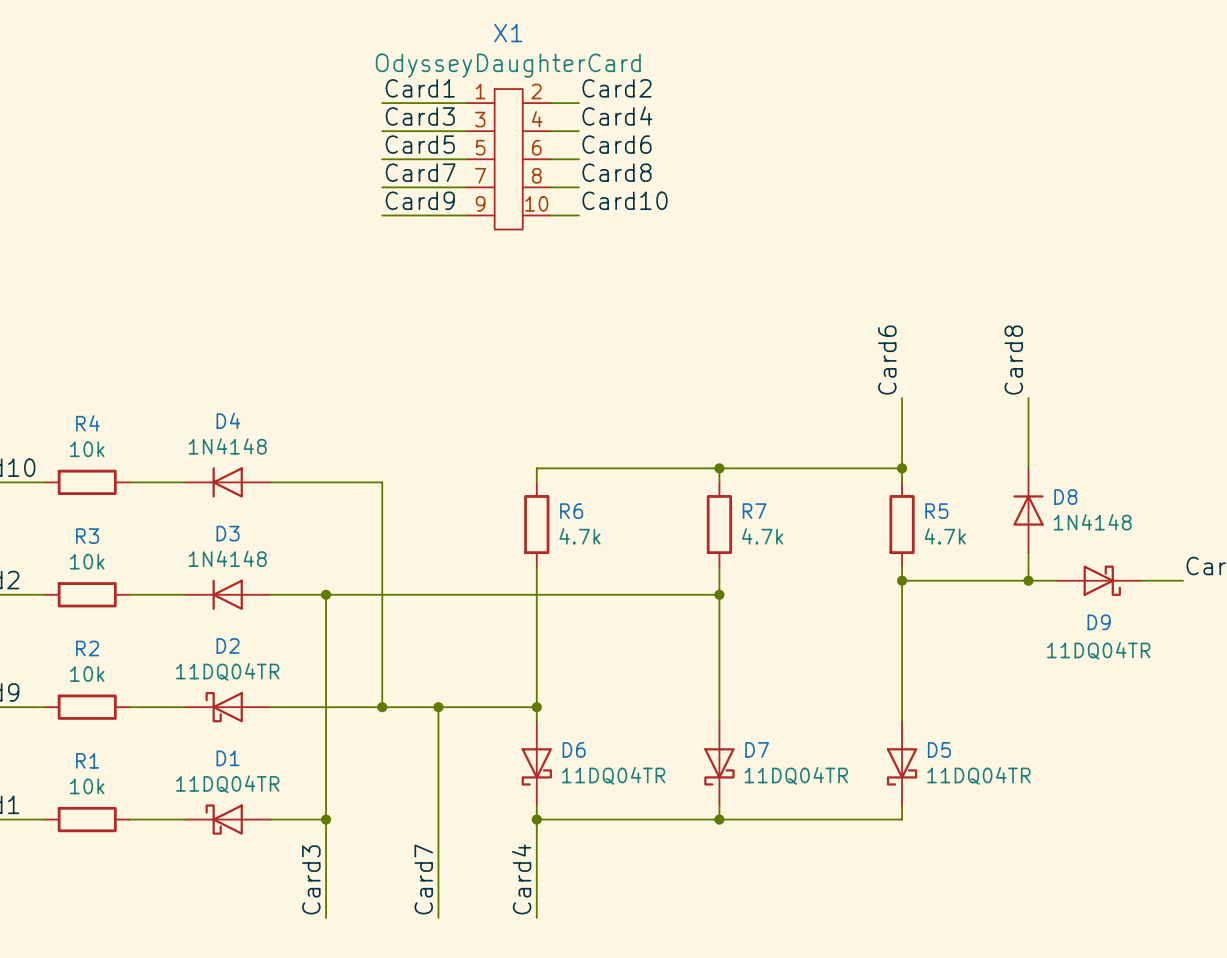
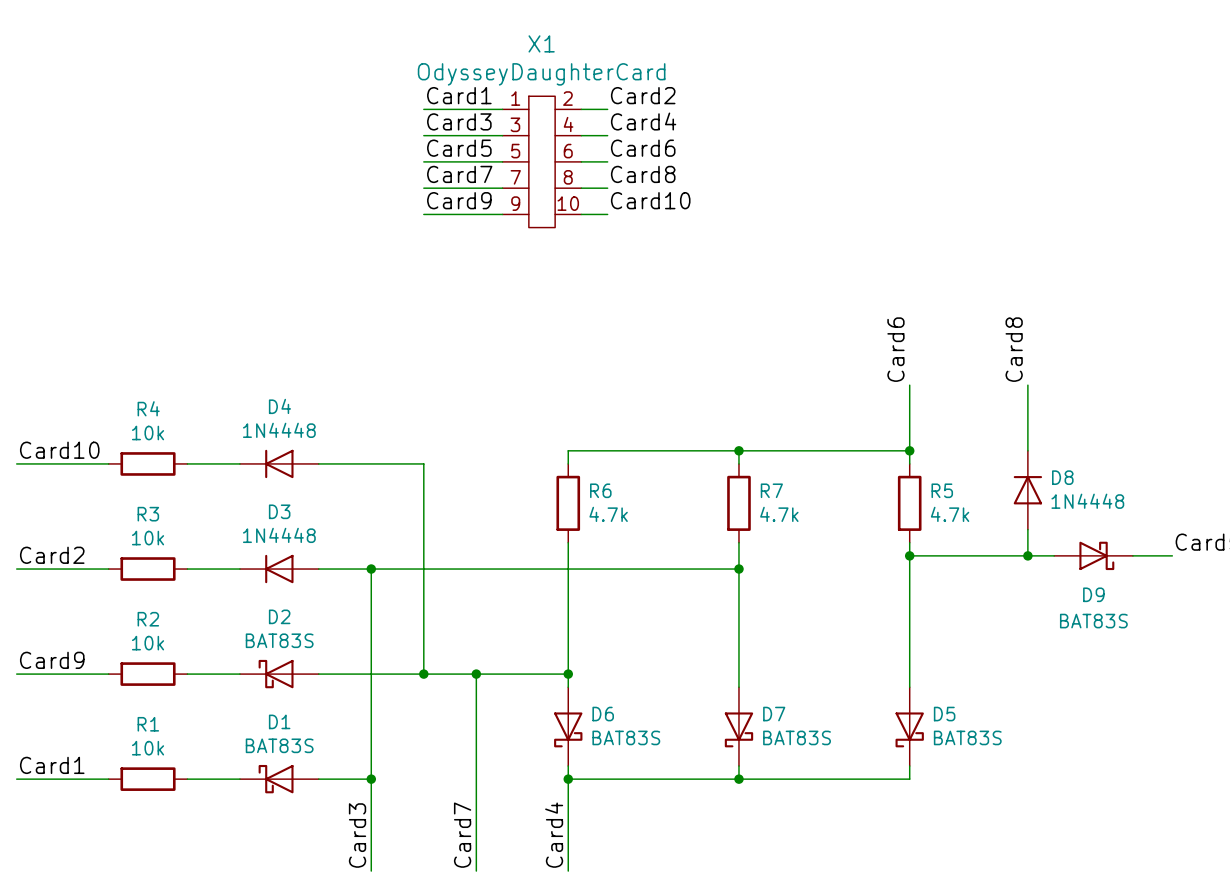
D4 value: 1N4148 (227, 446) -> 1N4448 (279, 430)
D8 value: 1N4148 (1092, 522) -> 1N4448 (1087, 501)
D3 value: 1N4148 (227, 558) -> 1N4448 (279, 535)
D9 value: 11DQ04TR (1098, 650) -> BAT83S (1093, 621)
D2 value: 11DQ04TR (227, 671) -> BAT83S (279, 640)
D6 value: 11DQ04TR (613, 775) -> BAT83S (626, 737)
D7 value: 11DQ04TR (796, 775) -> BAT83S (797, 737)
D5 value: 11DQ04TR (978, 775) -> BAT83S (967, 737)
D1 value: 11DQ04TR (227, 784) -> BAT83S (279, 745)

